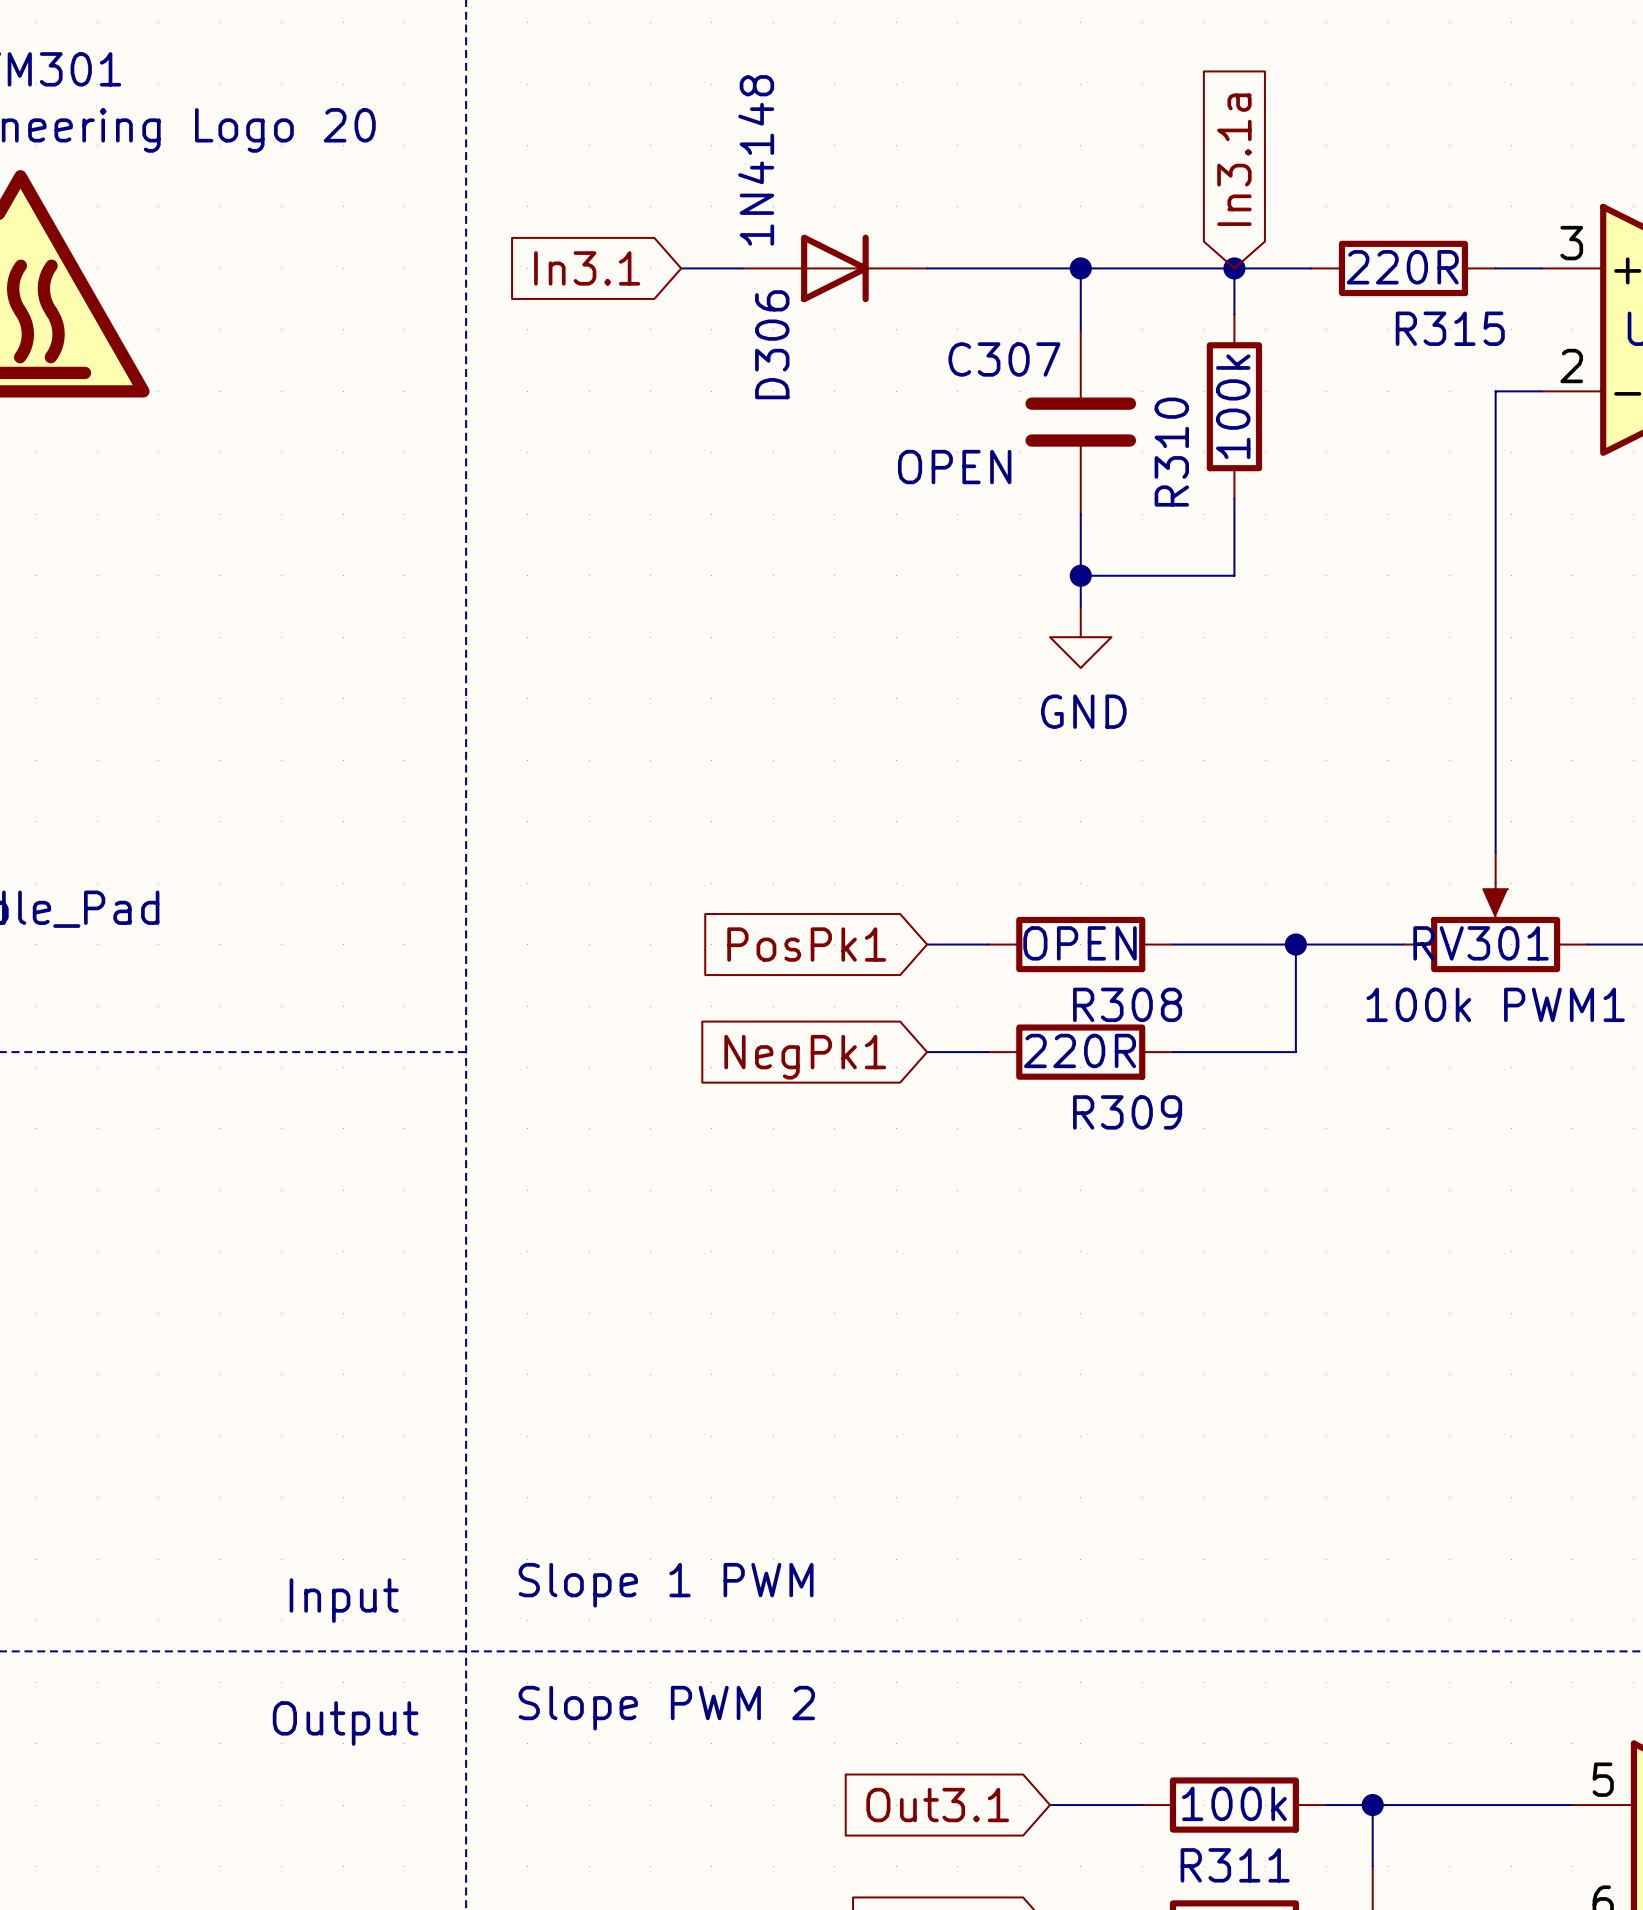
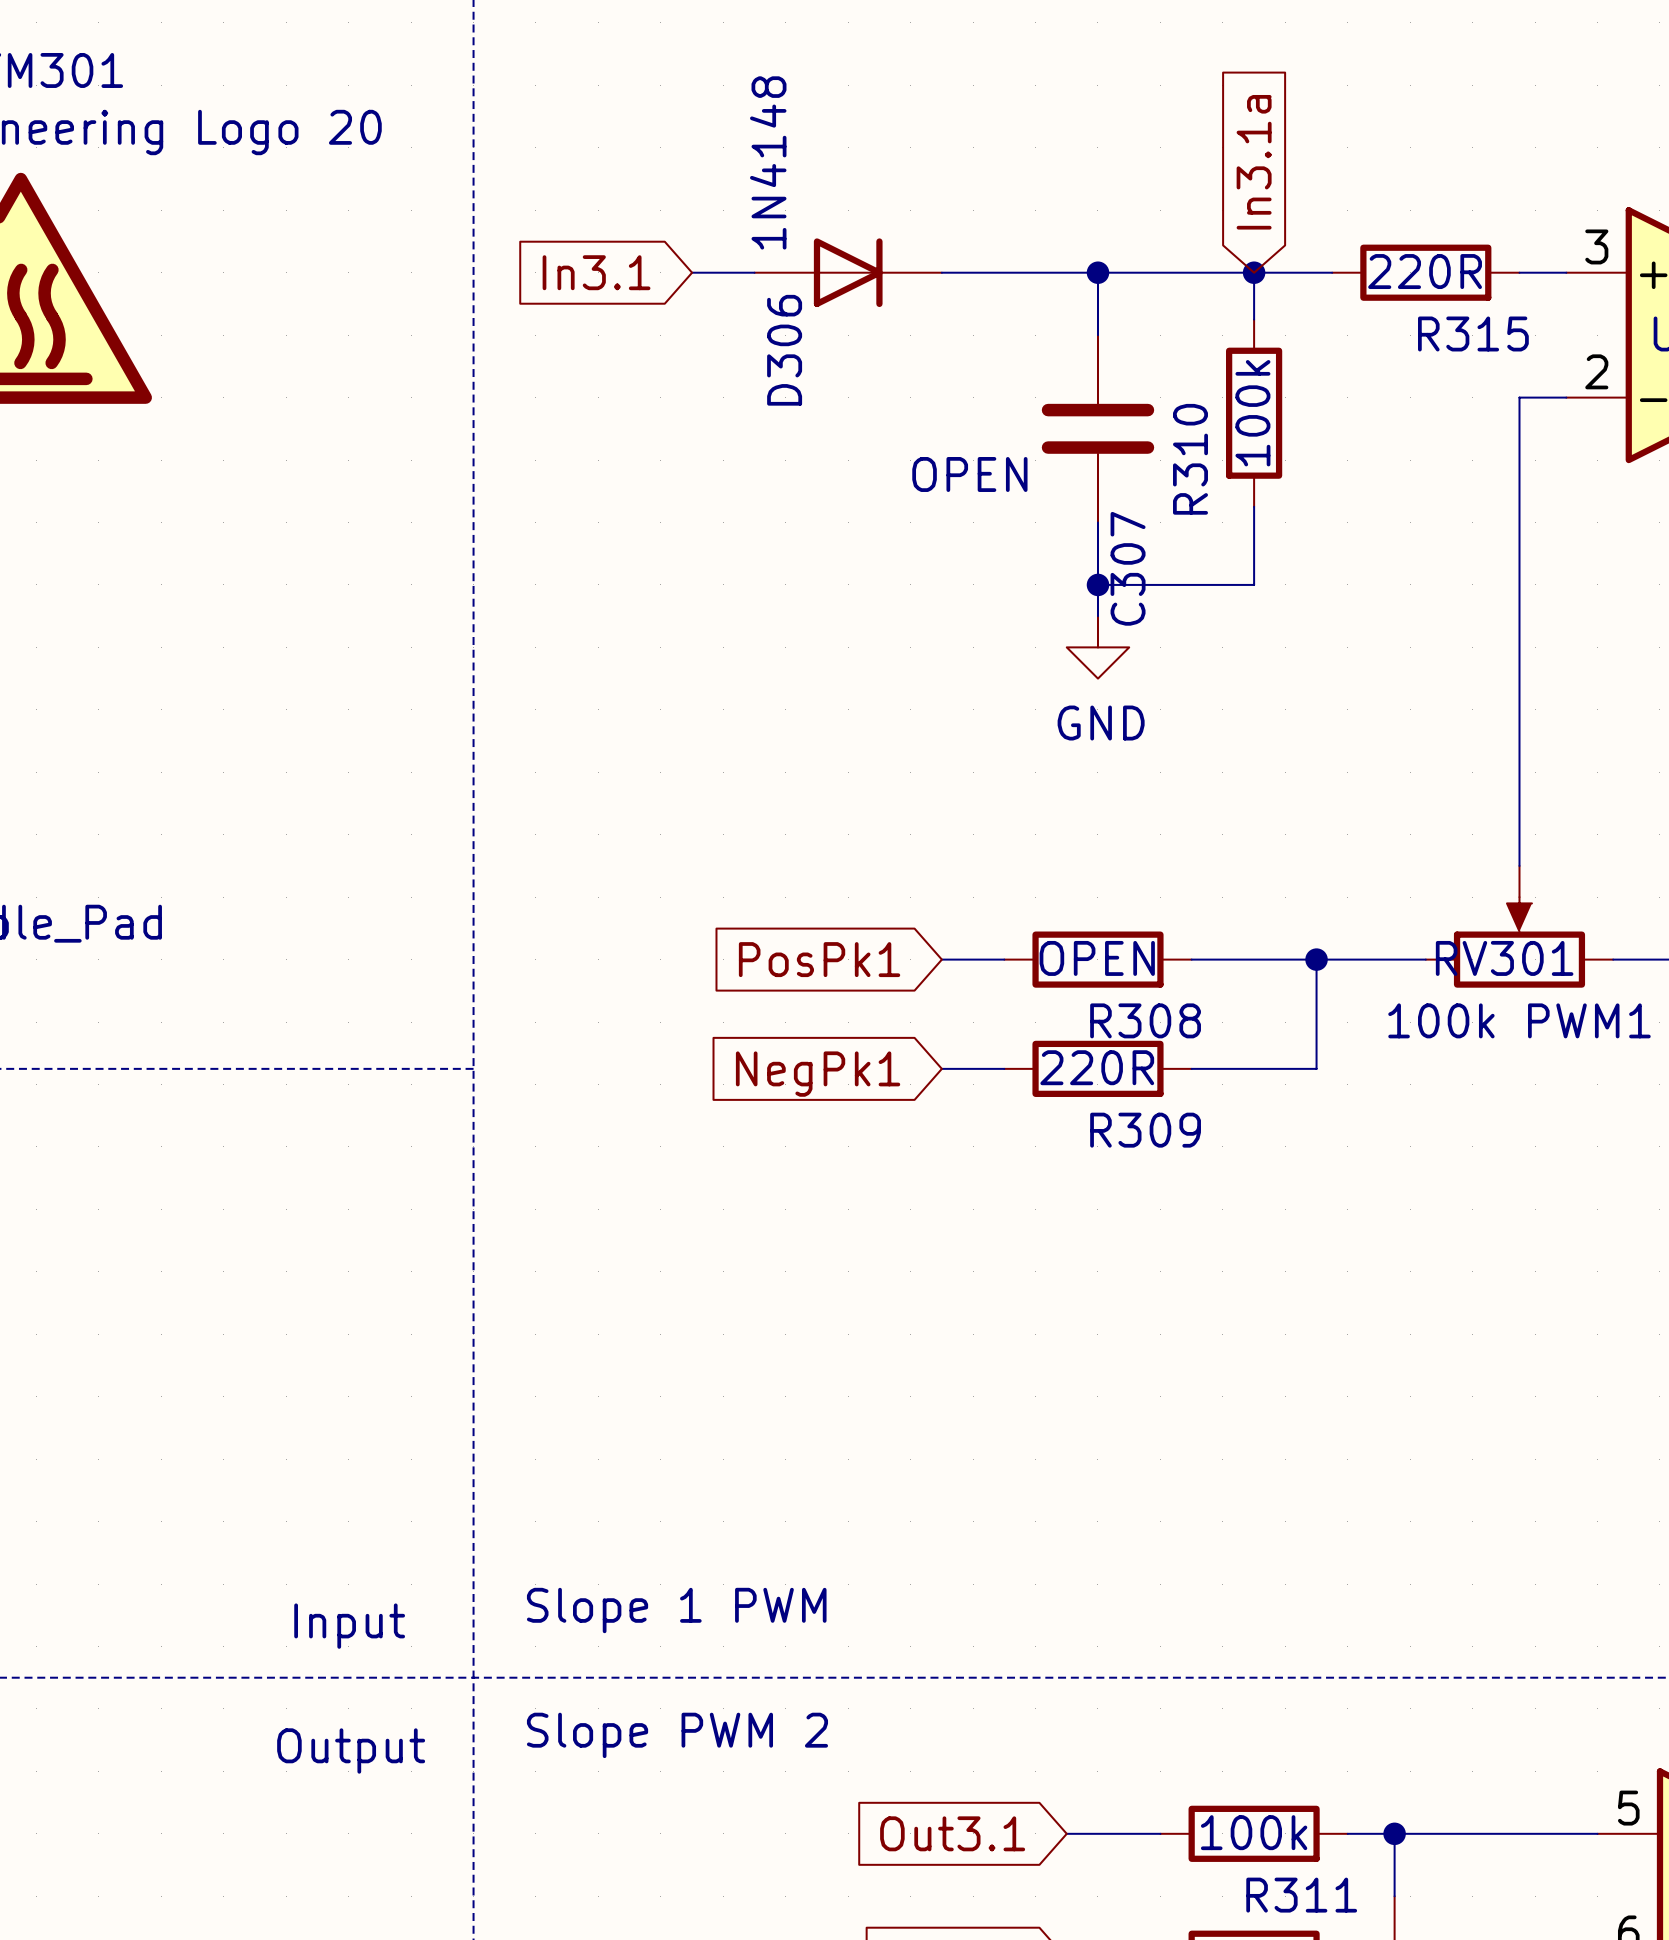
C307 name rotation: 0° (1004, 359) -> 90° counterclockwise (1128, 568)
C307 name position: C307 (1004, 359) -> C307 (1128, 568)
R311 name position: R311 (1235, 1865) -> R311 (1301, 1895)

